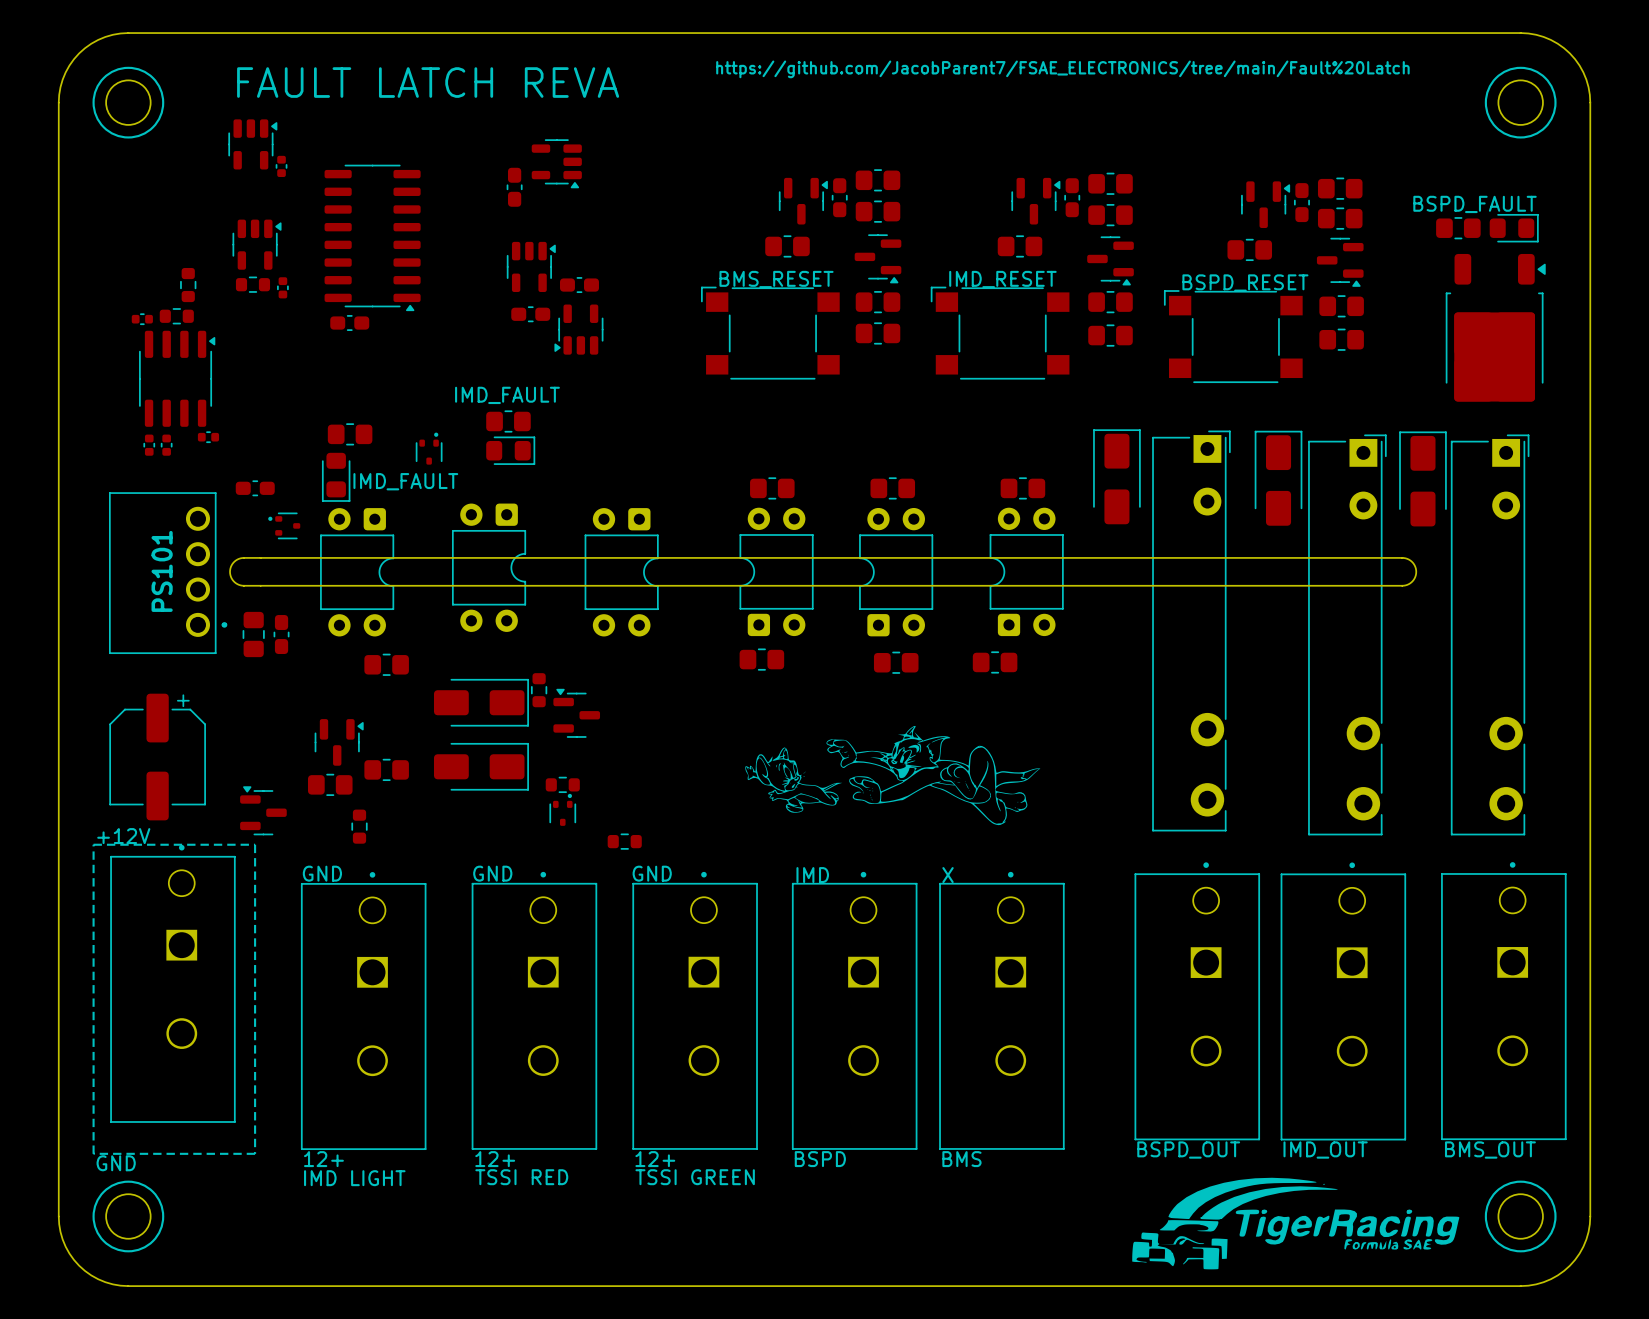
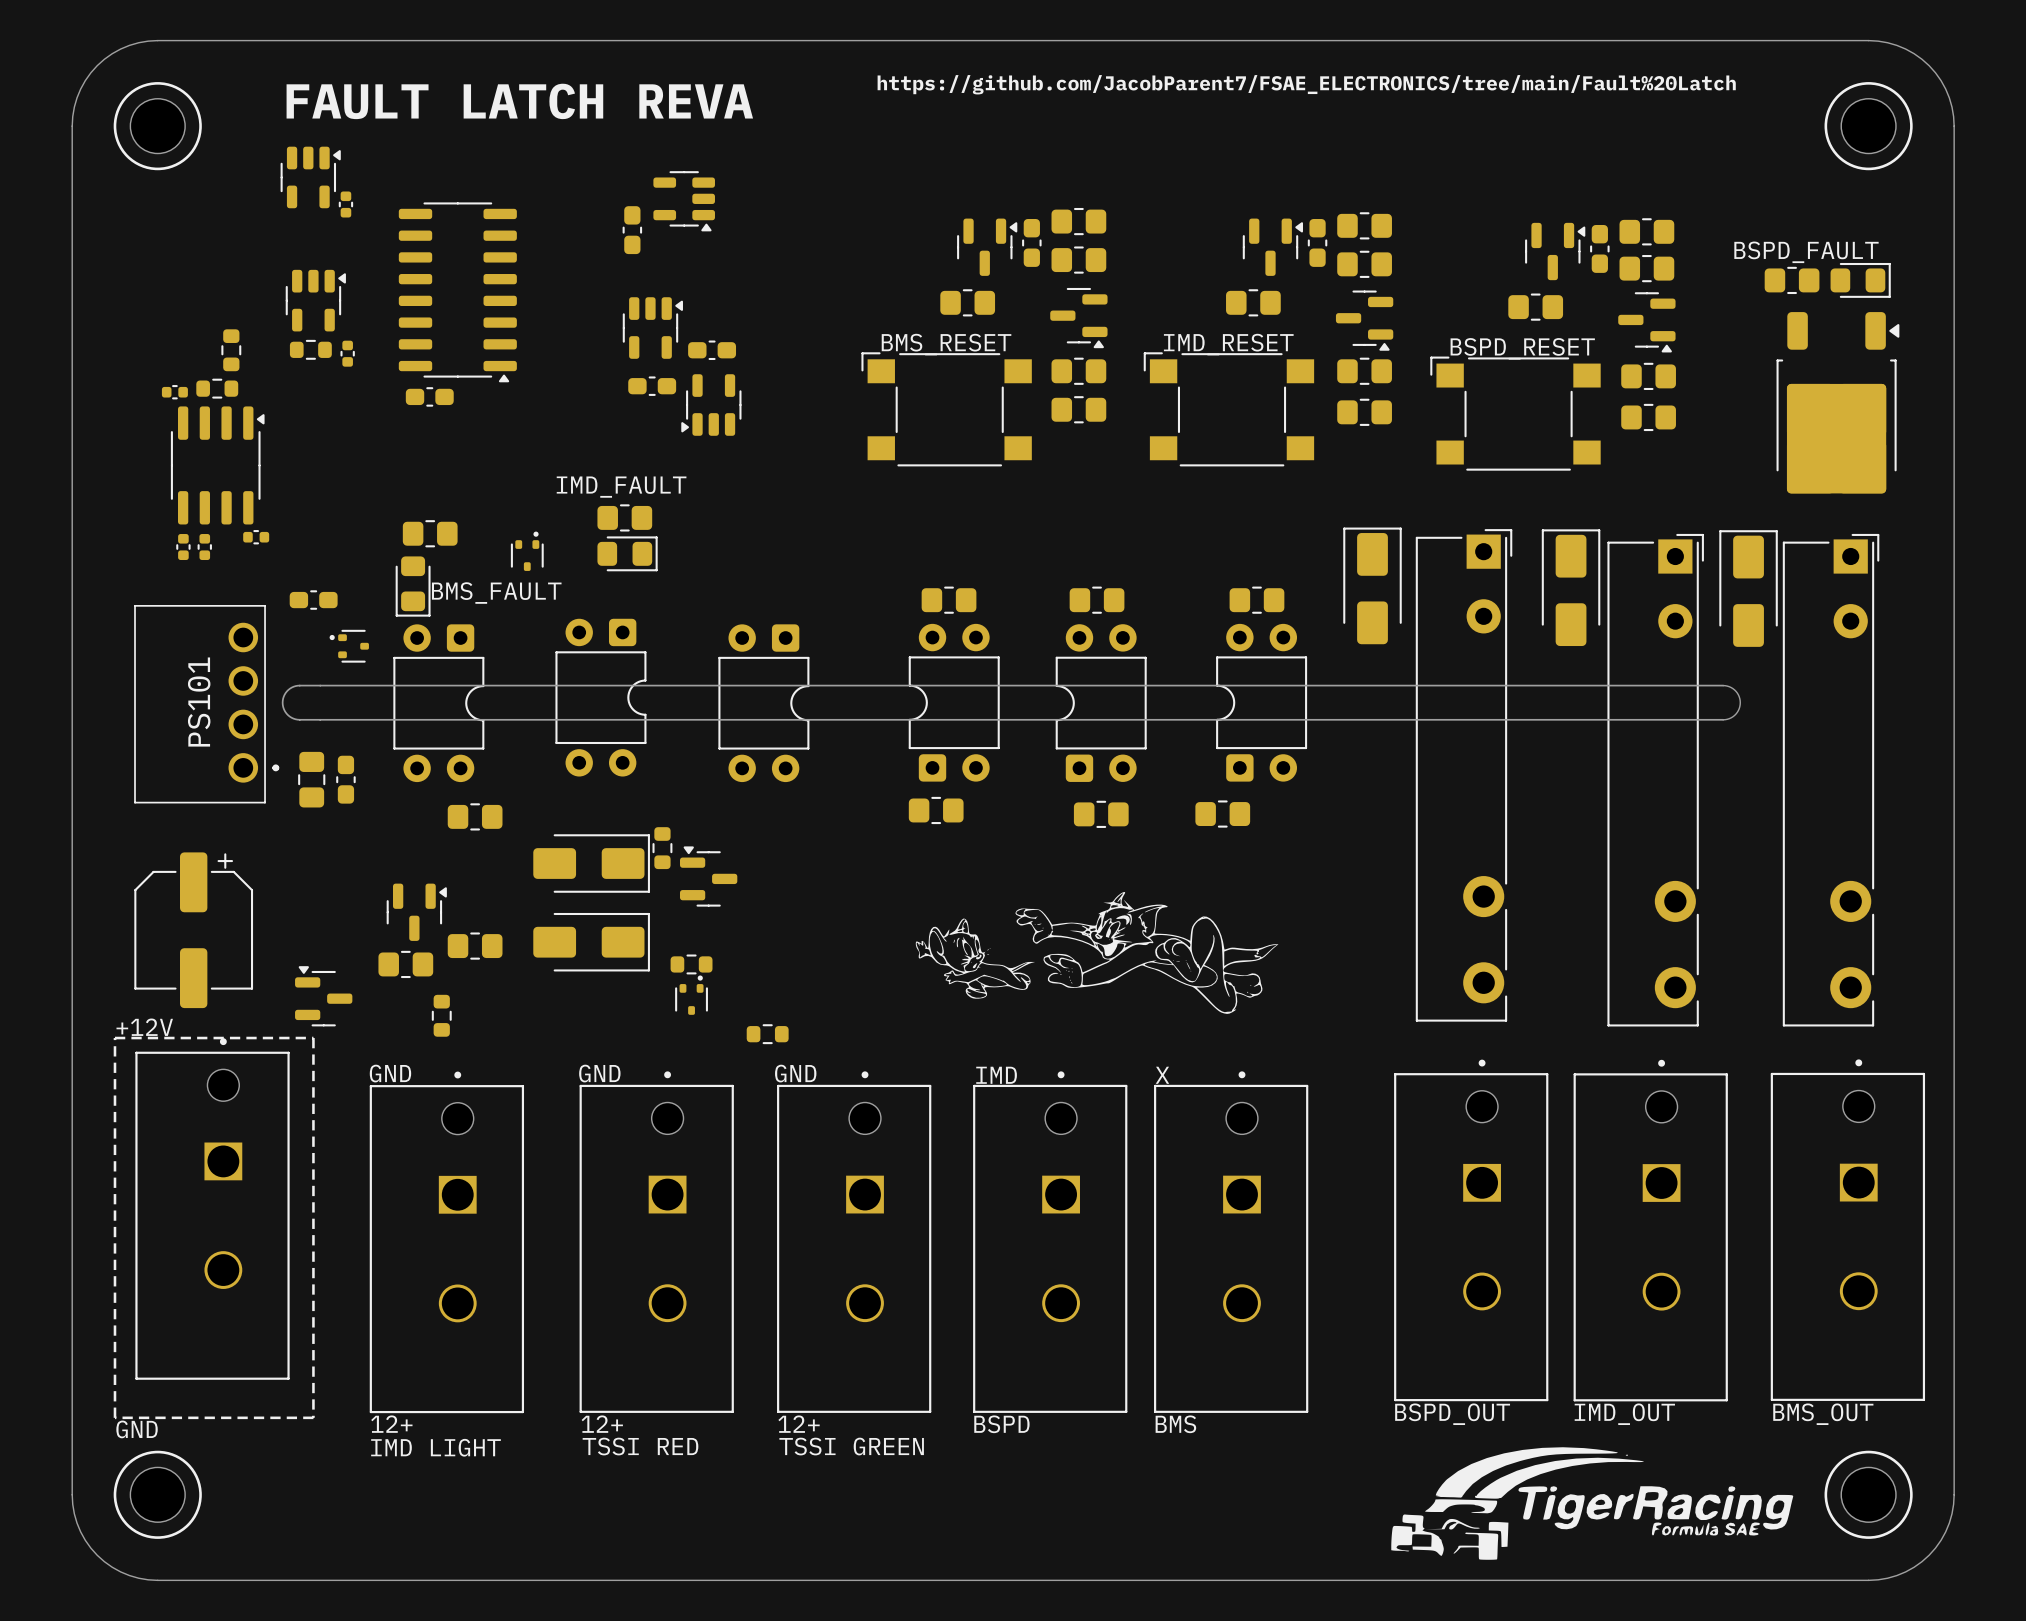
text: IMD_FAULT (405, 481) -> BMS_FAULT (496, 593)

